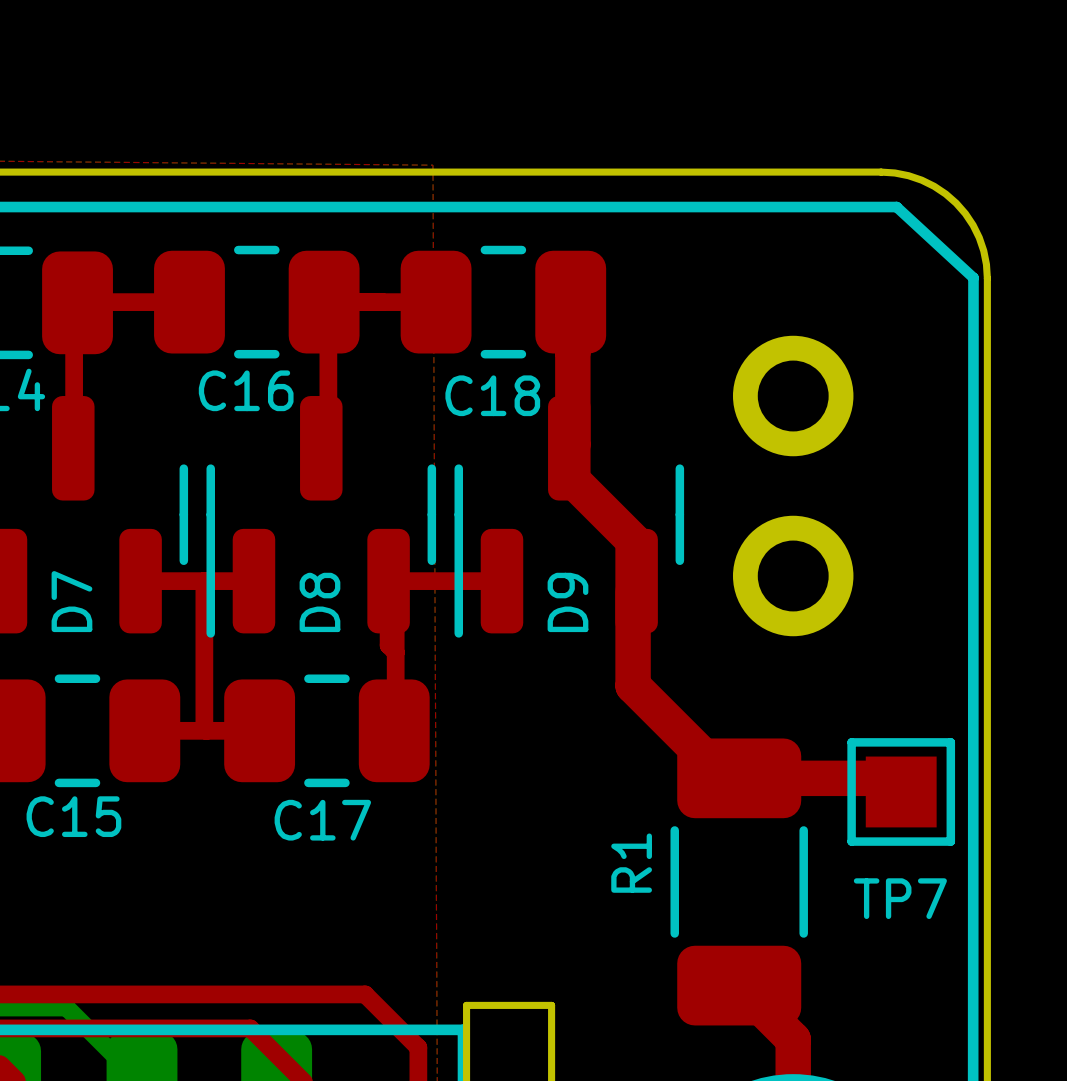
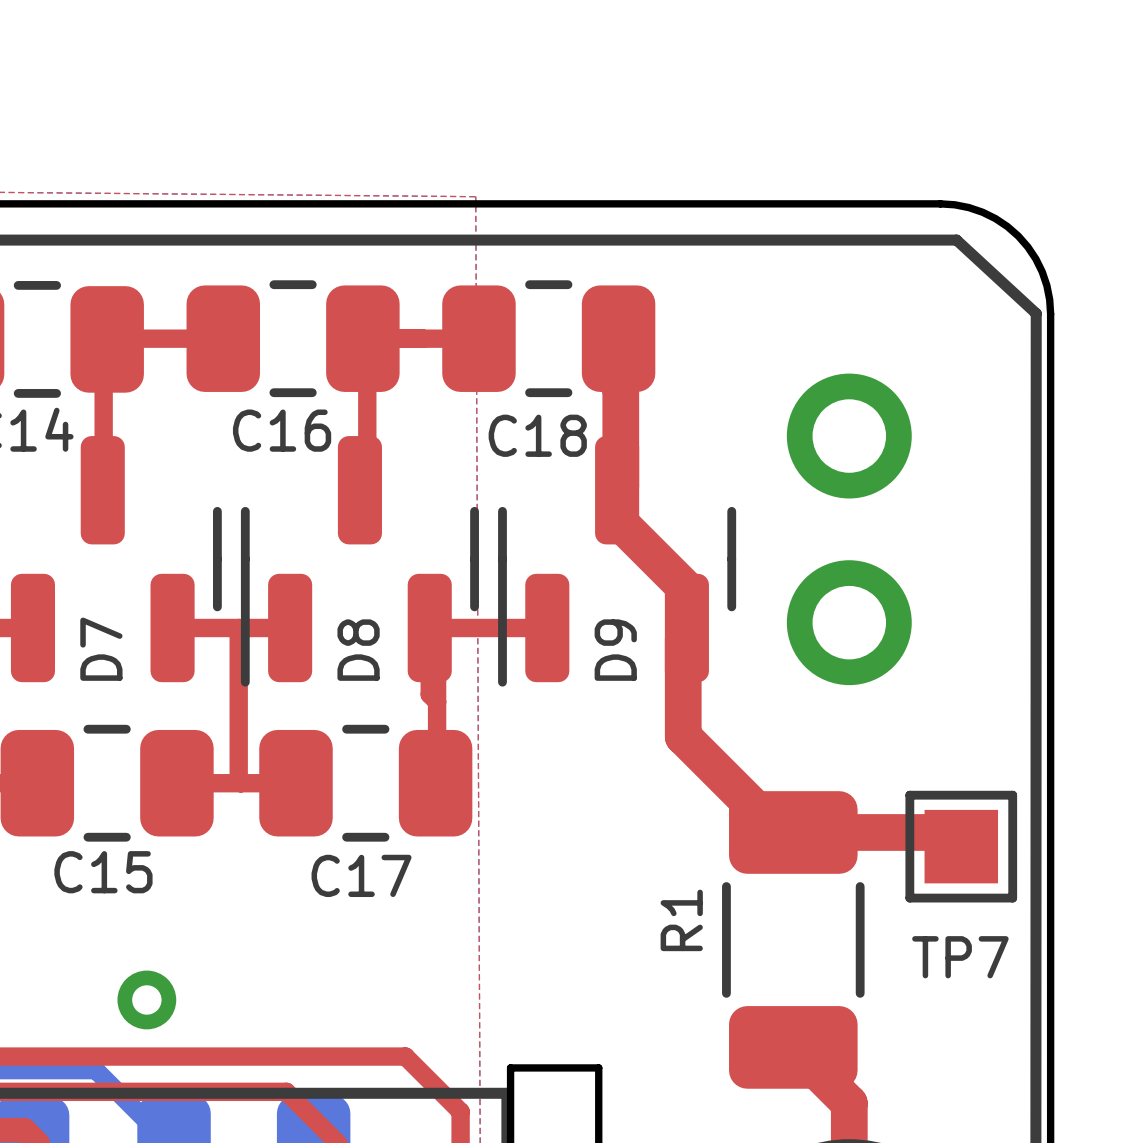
via: none -> (146, 999)

